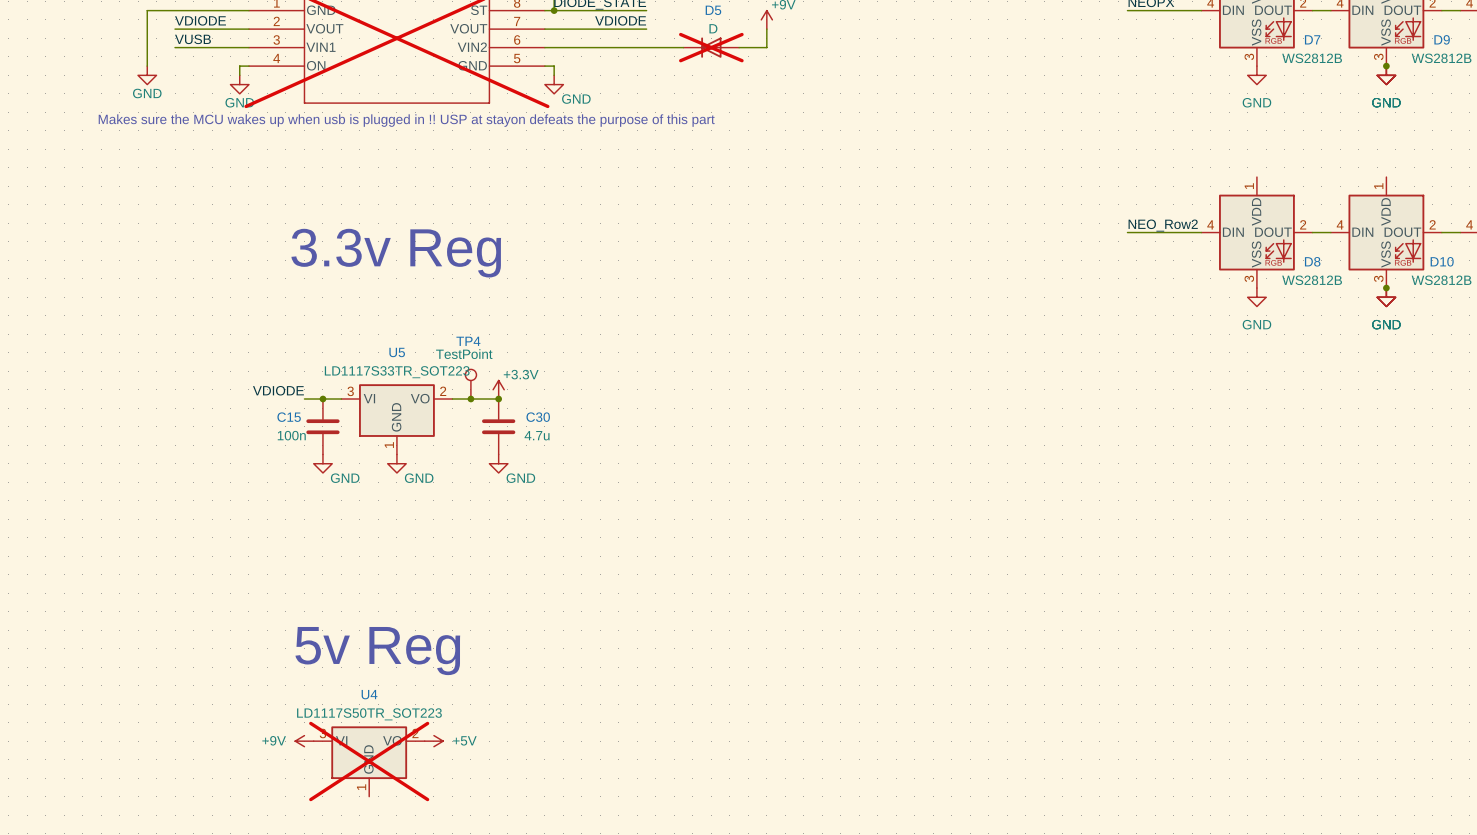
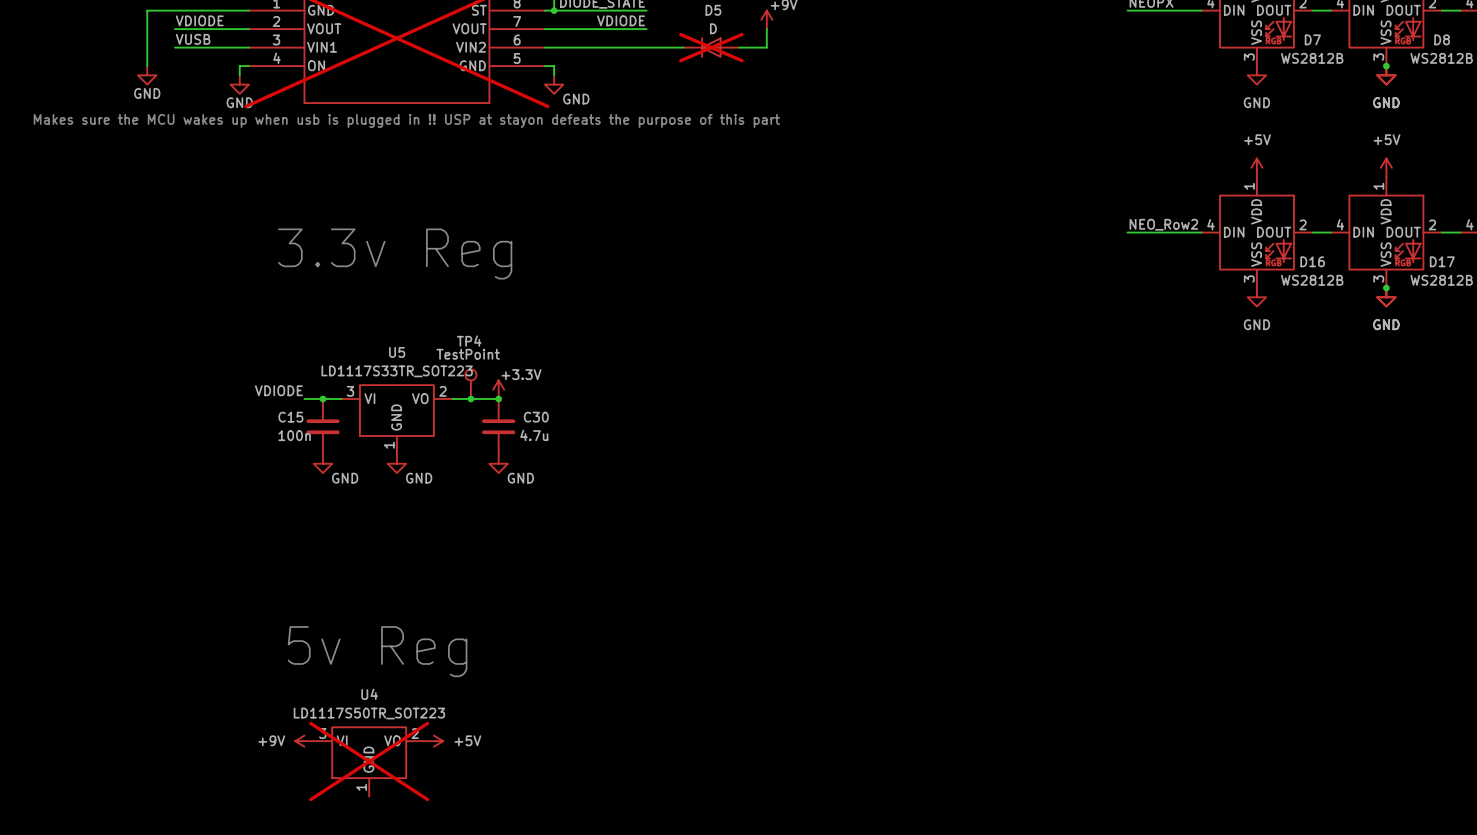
D9 name: D9 (1442, 39) -> D8 (1442, 39)
power symbol: none -> +5V (1256, 167)
power symbol: none -> +5V (1386, 167)
D8 name: D8 (1312, 261) -> D16 (1312, 261)
D10 name: D10 (1442, 261) -> D17 (1442, 261)

